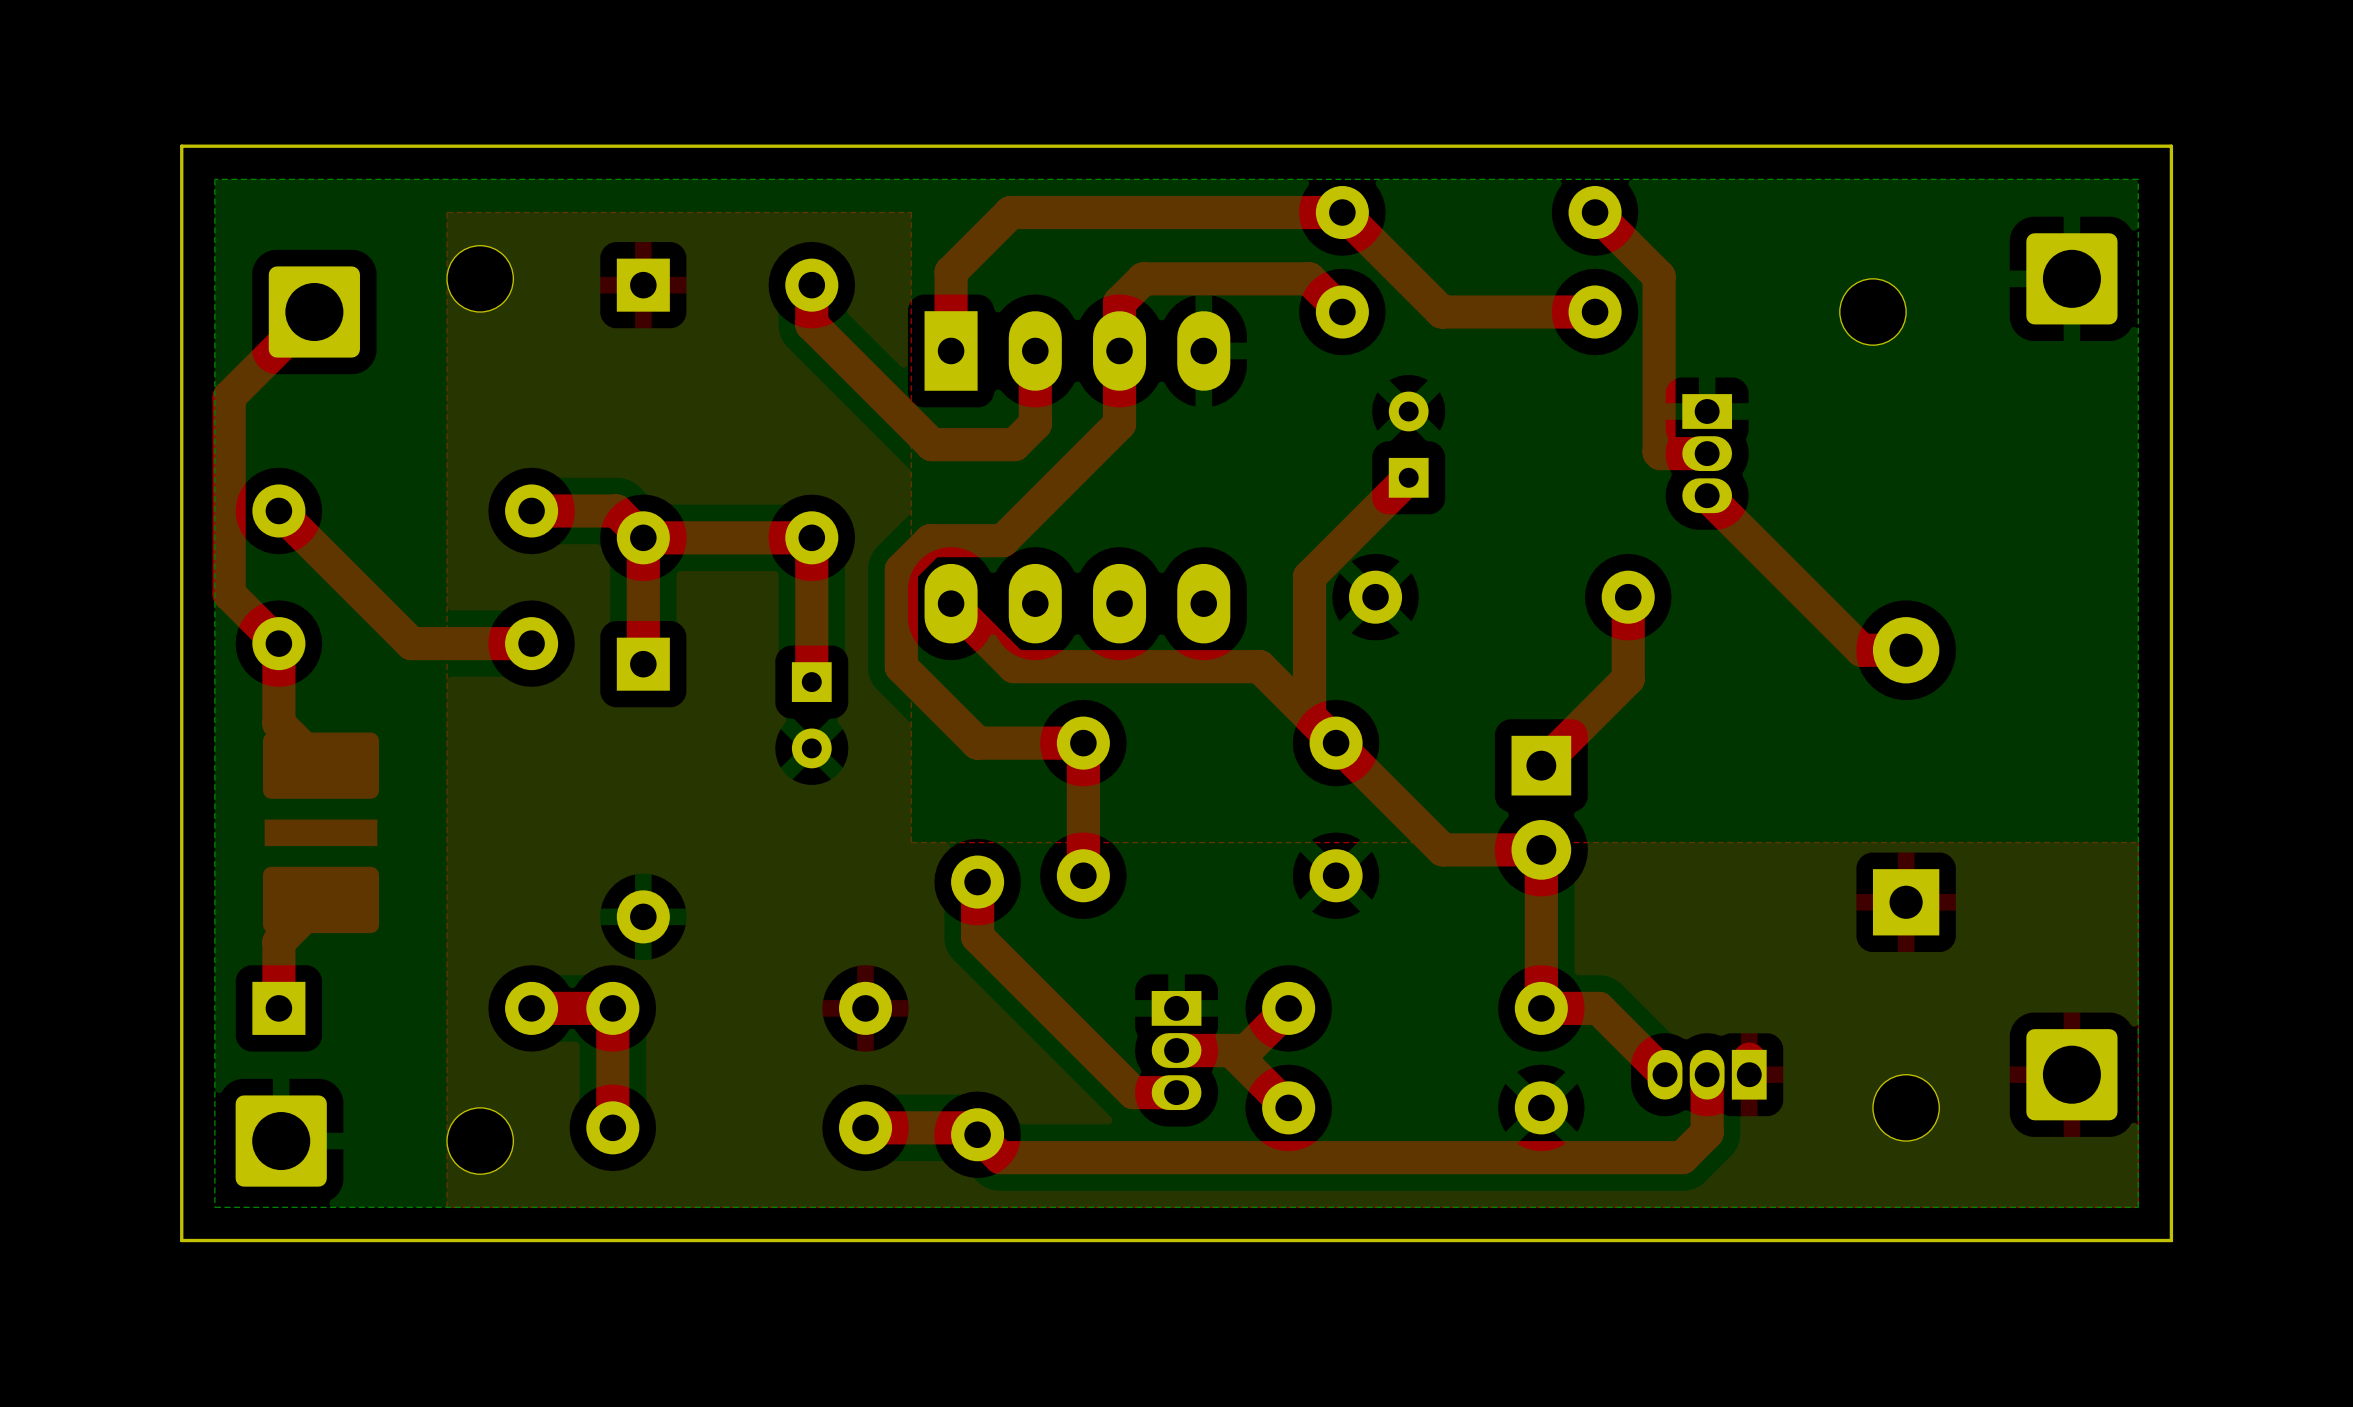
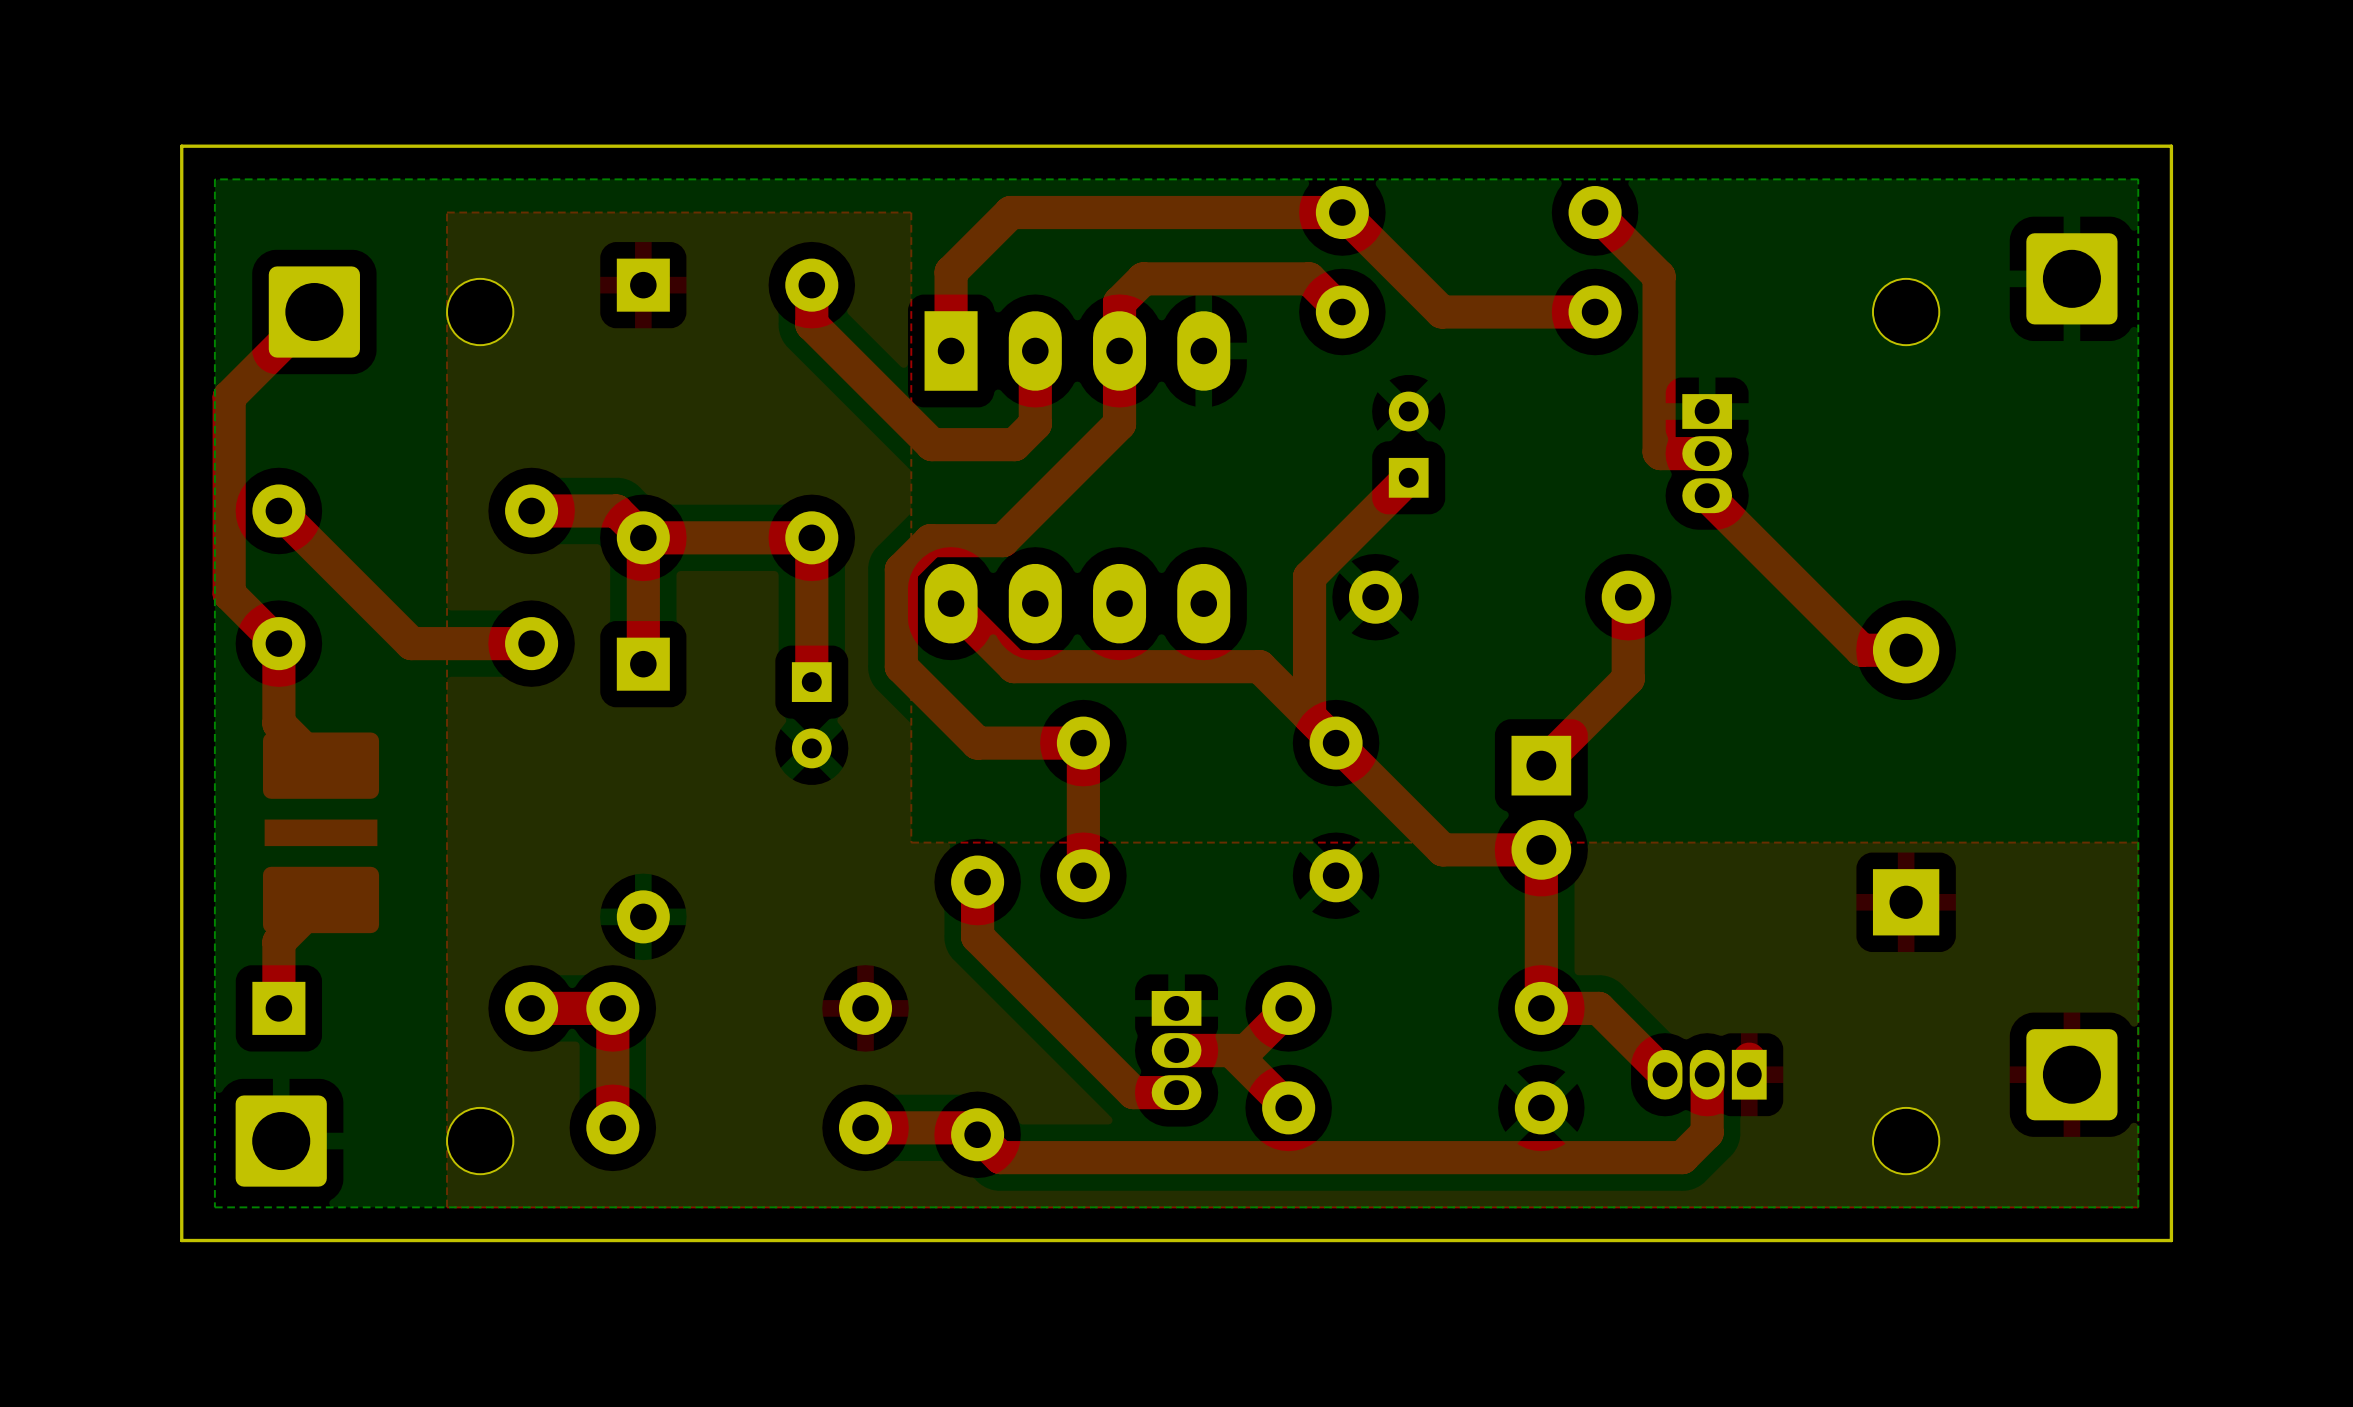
part position: (480, 278) -> (480, 312)
part position: (1872, 312) -> (1906, 312)
part position: (1906, 1107) -> (1906, 1141)

